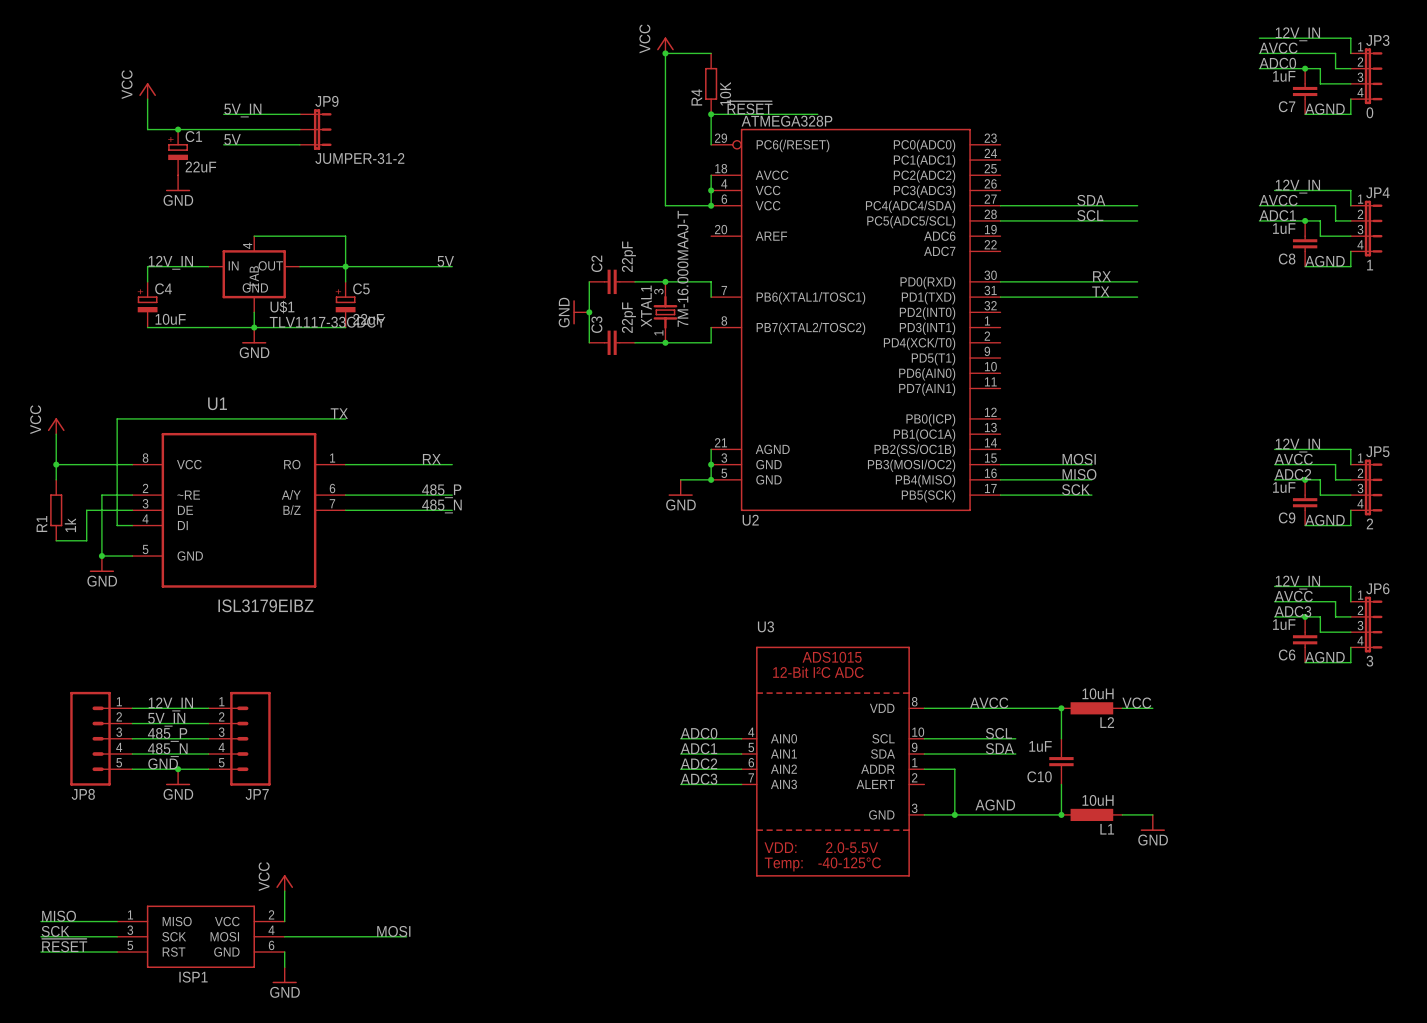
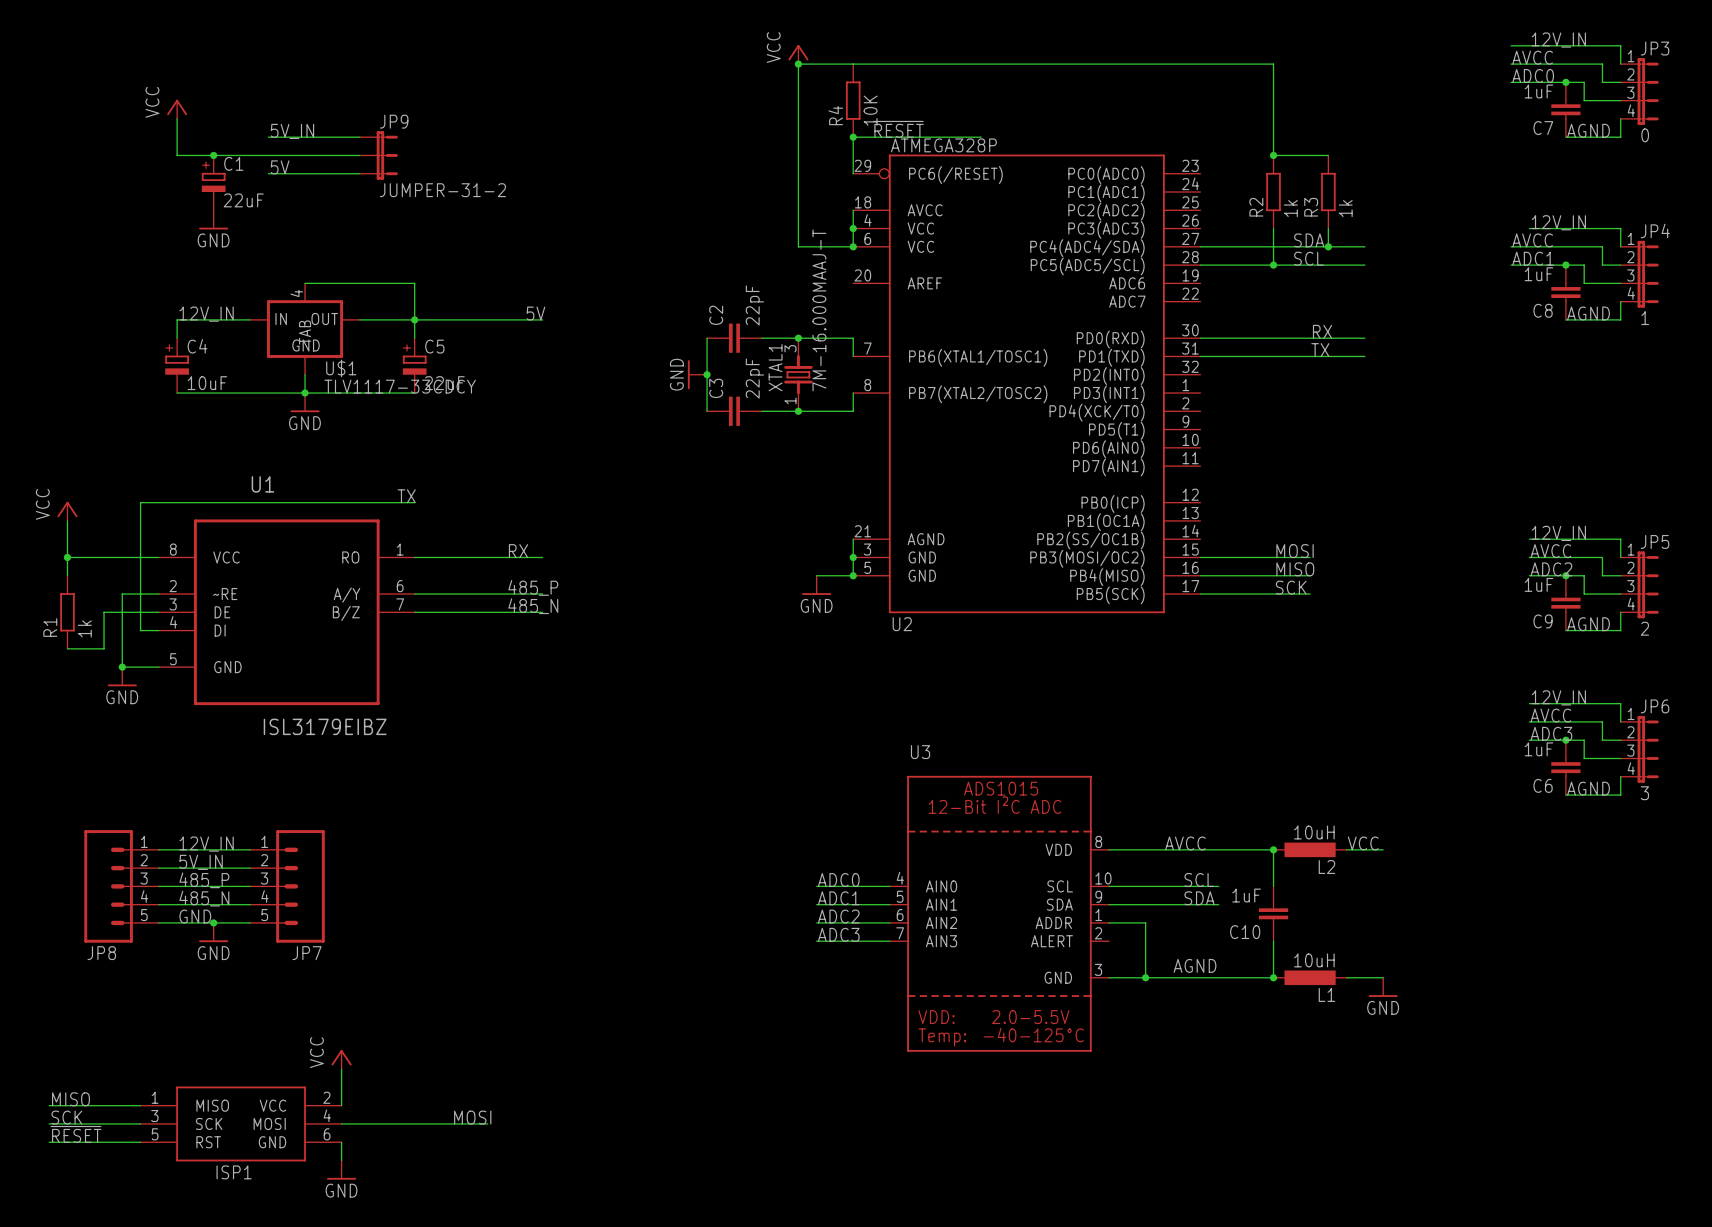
wire: none -> (853, 64) (1273, 64) (1273, 155) (1328, 155)
junction: none -> (1273, 155)
R2: none -> 1k (1273, 192)
R3: none -> 1k (1328, 192)
wire: none -> (1273, 228) (1273, 265)
wire: none -> (1328, 228) (1328, 246)
junction: none -> (1328, 246)
junction: none -> (1273, 265)

